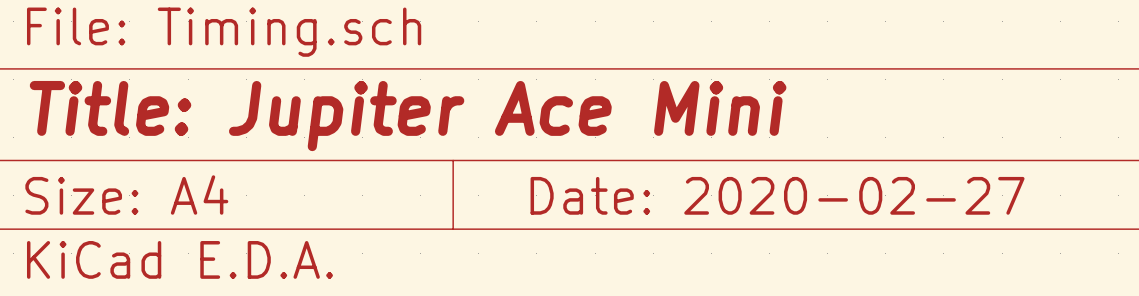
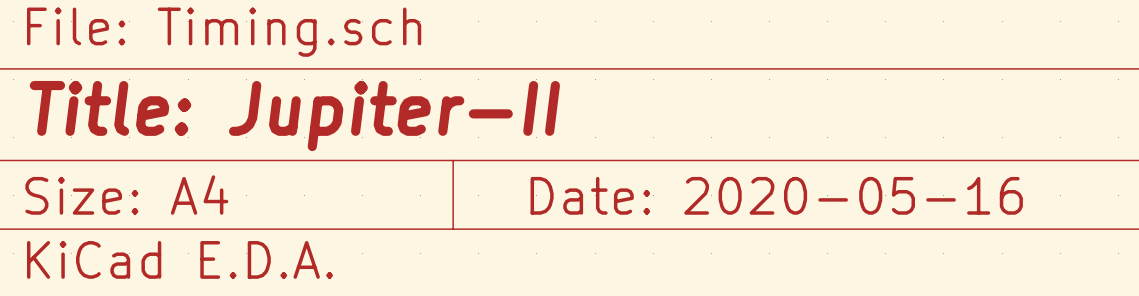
title block: Title: Jupiter Ace Mini (408, 116) -> Title: Jupiter-II (294, 116)
title block: Date: 2020-02-27 (777, 195) -> Date: 2020-05-16 (776, 195)

